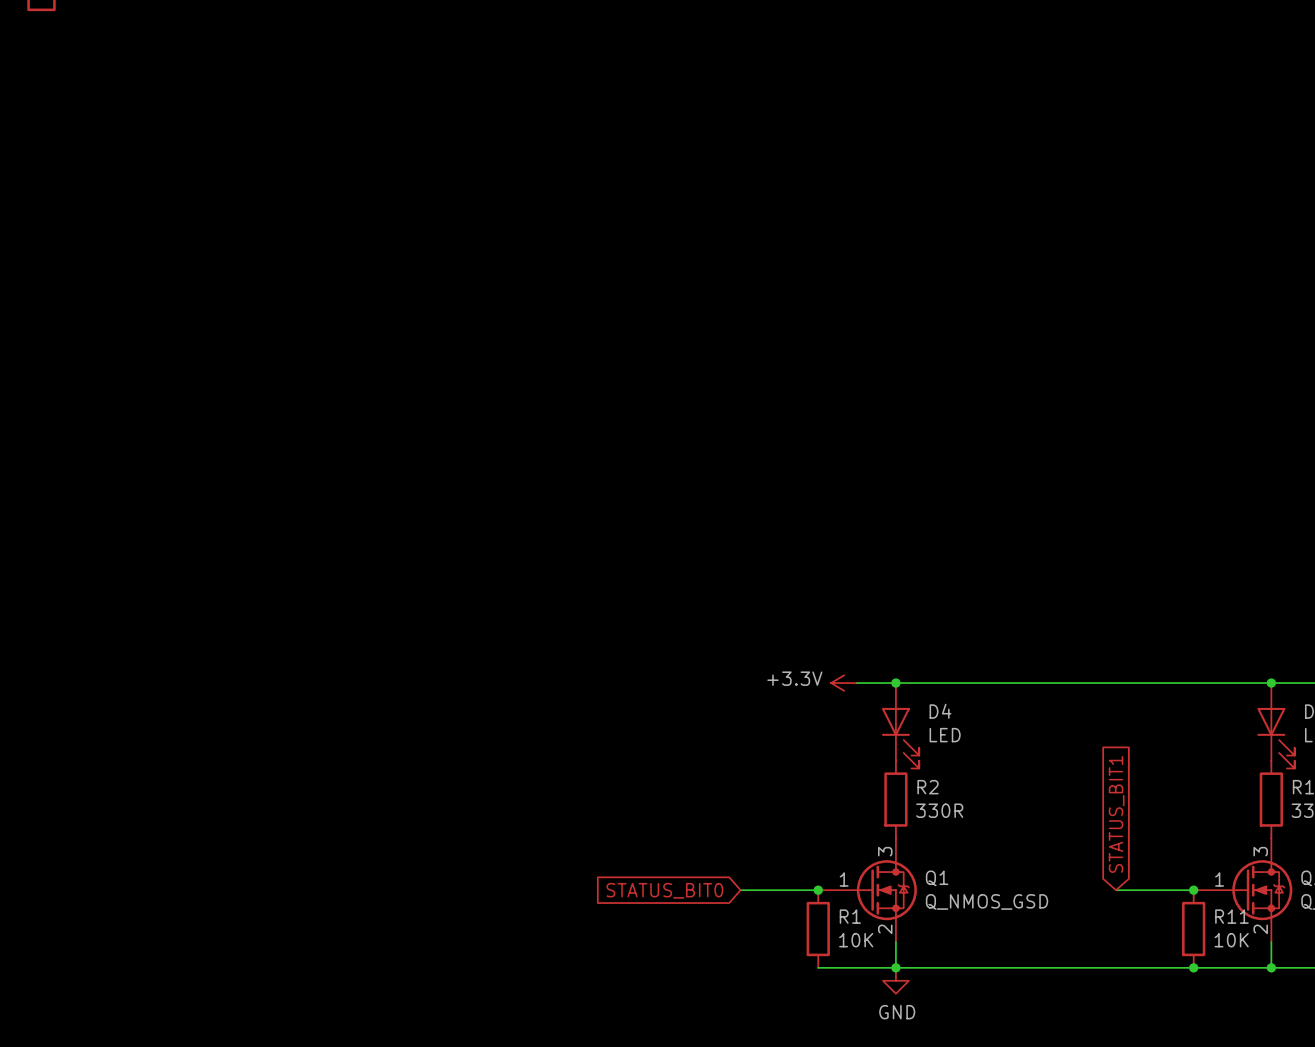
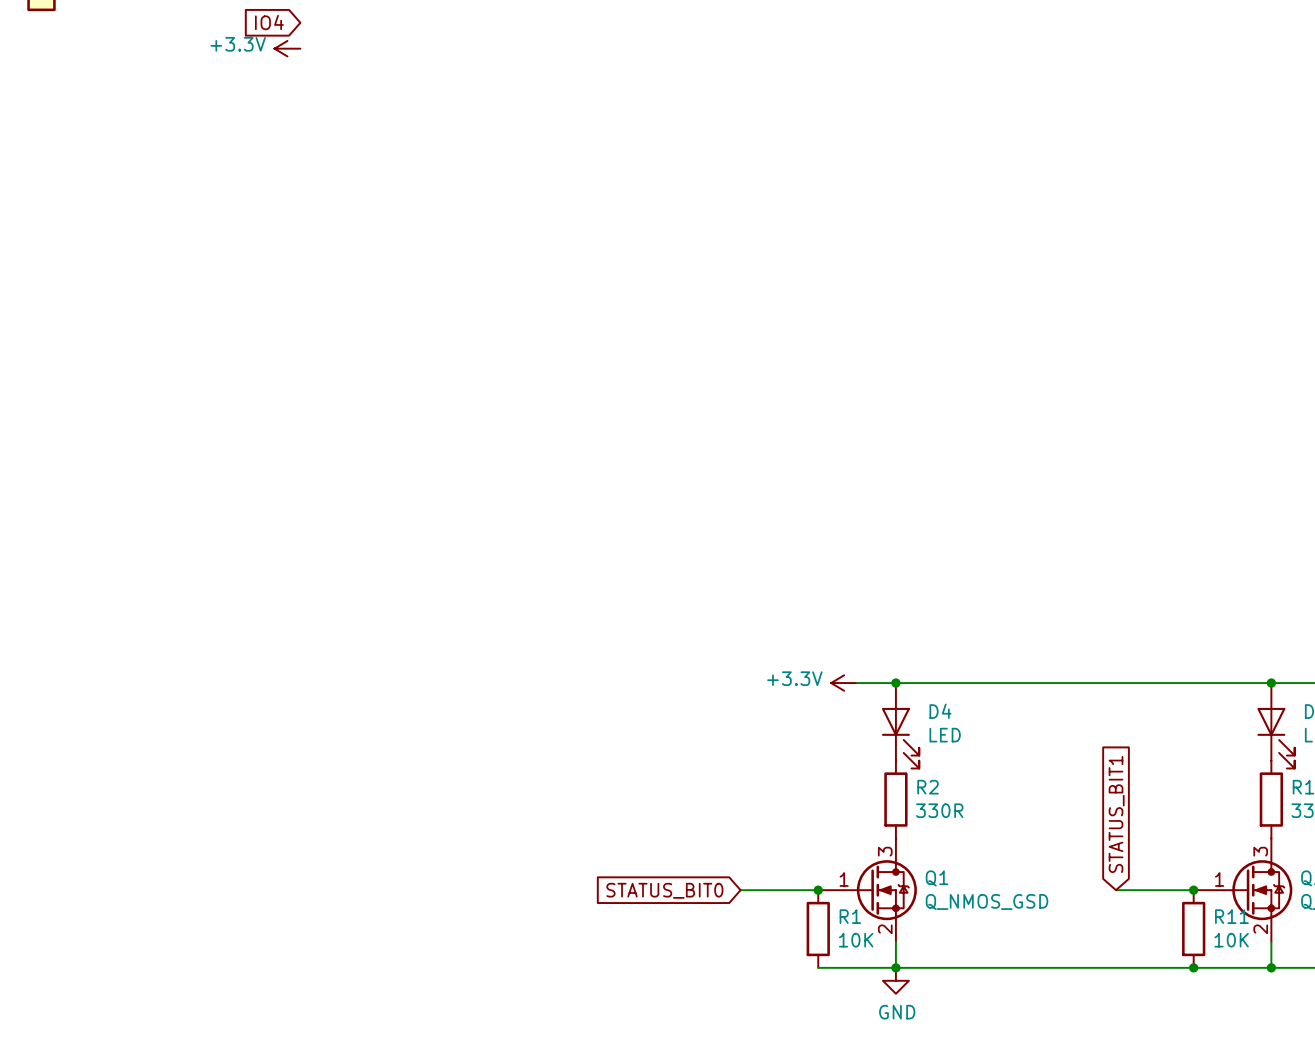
global label: none -> IO4 (269, 22)
power symbol: none -> +3.3V (287, 48)

